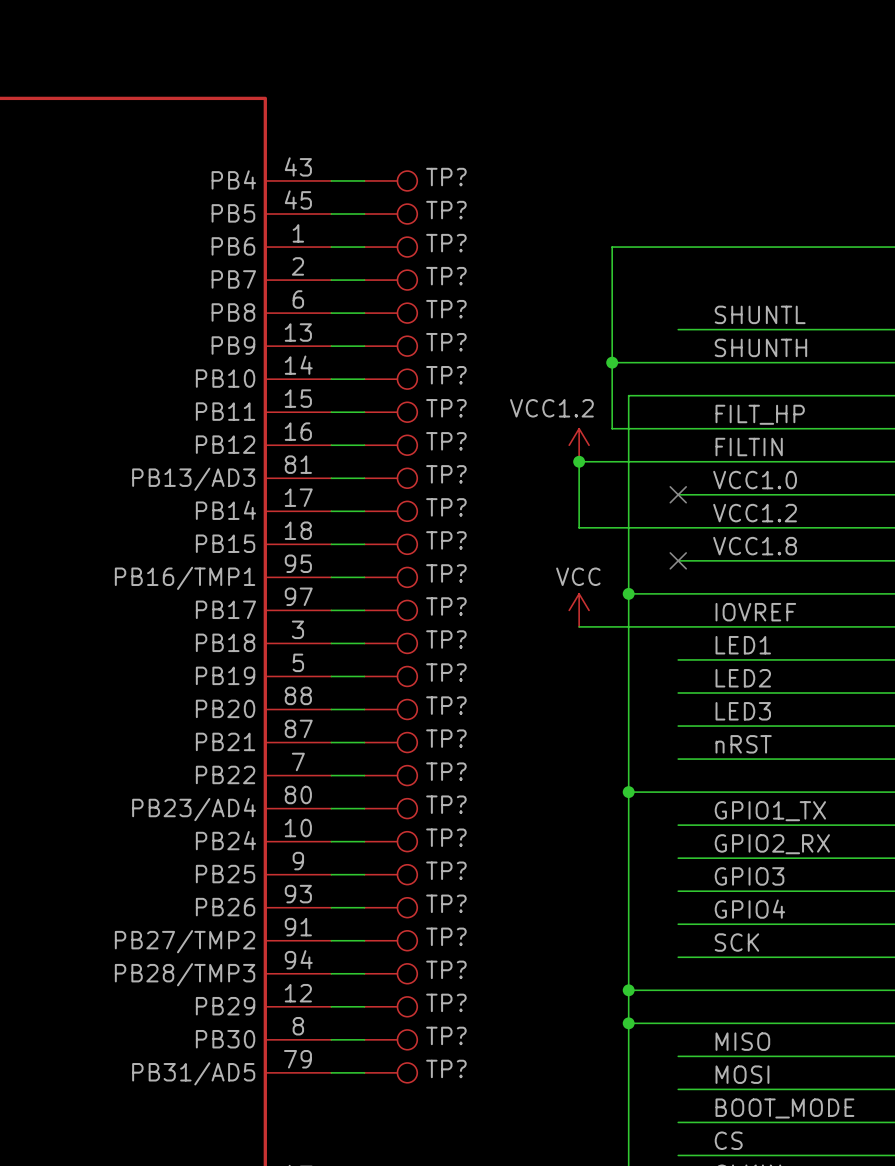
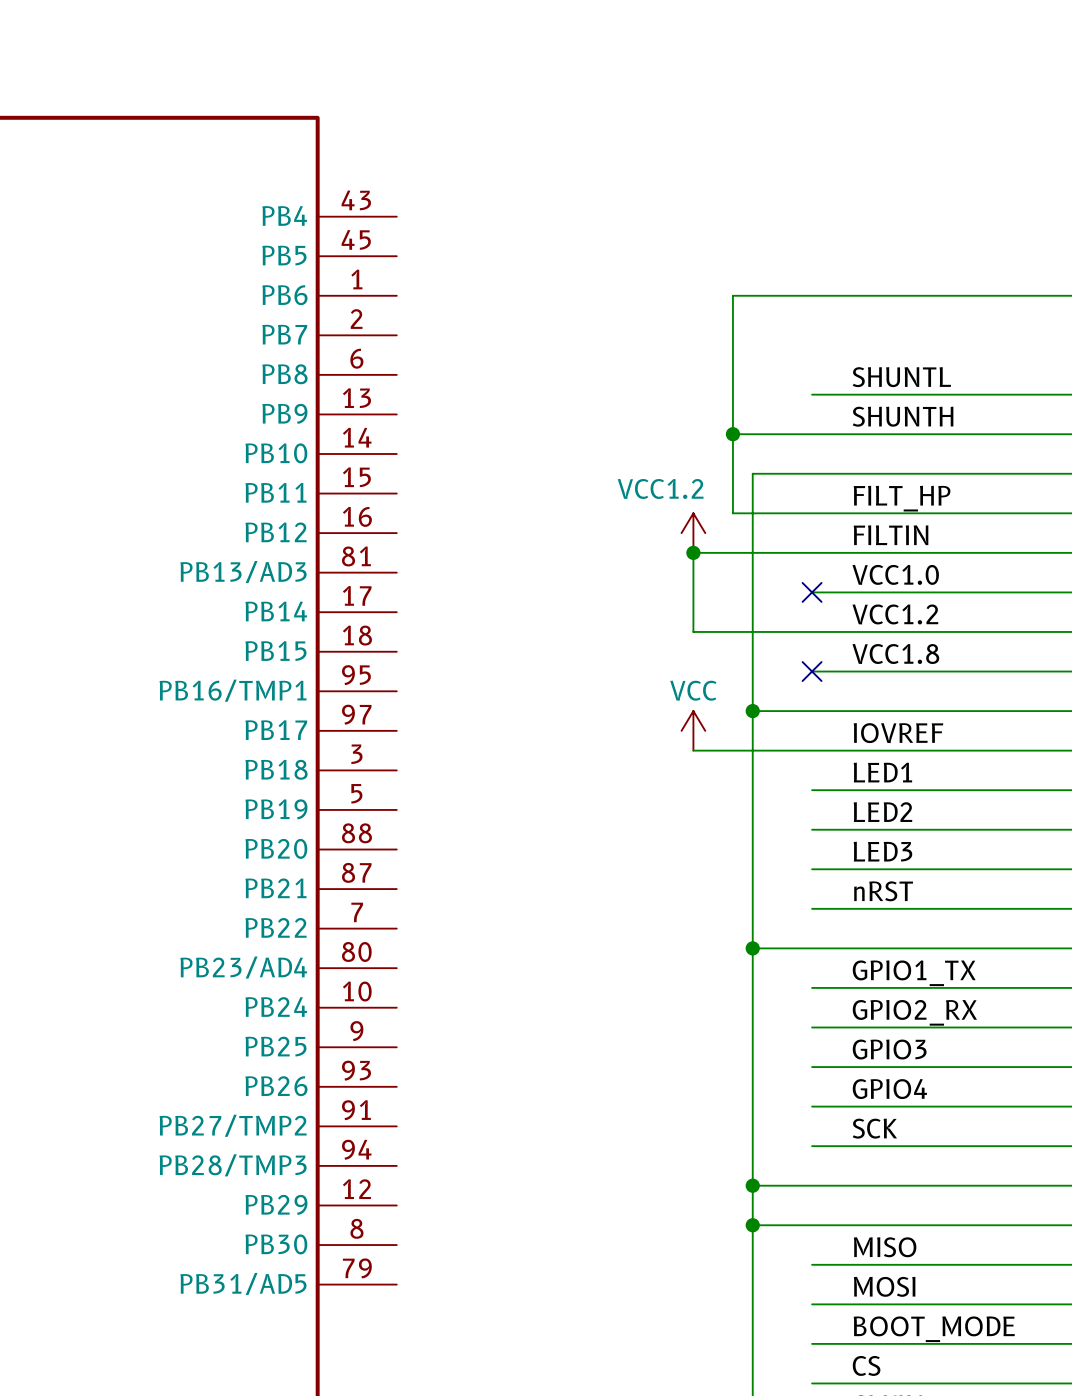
wire: (331, 180) (364, 180) -> none
TP?: (390, 180) -> none
wire: (331, 214) (364, 214) -> none
TP?: (390, 214) -> none
wire: (331, 247) (364, 247) -> none
TP?: (390, 247) -> none
wire: (331, 280) (364, 280) -> none
TP?: (390, 280) -> none
wire: (331, 313) (364, 313) -> none
TP?: (390, 313) -> none
wire: (331, 346) (364, 346) -> none
TP?: (390, 346) -> none
wire: (331, 379) (364, 379) -> none
TP?: (390, 379) -> none
wire: (331, 412) (364, 412) -> none
TP?: (390, 412) -> none
wire: (331, 445) (364, 445) -> none
TP?: (390, 445) -> none
wire: (331, 478) (364, 478) -> none
TP?: (390, 478) -> none
wire: (331, 511) (364, 511) -> none
TP?: (390, 511) -> none
wire: (331, 544) (364, 544) -> none
TP?: (390, 544) -> none
wire: (331, 577) (364, 577) -> none
TP?: (390, 577) -> none
wire: (331, 610) (364, 610) -> none
TP?: (390, 610) -> none
wire: (331, 643) (364, 643) -> none
TP?: (390, 643) -> none
wire: (331, 676) (364, 676) -> none
TP?: (390, 676) -> none
wire: (331, 709) (364, 709) -> none
TP?: (390, 709) -> none
wire: (331, 742) (364, 742) -> none
TP?: (390, 742) -> none
wire: (331, 775) (364, 775) -> none
TP?: (390, 775) -> none
wire: (331, 808) (364, 808) -> none
TP?: (390, 808) -> none
wire: (331, 841) (364, 841) -> none
TP?: (390, 841) -> none
wire: (331, 874) (364, 874) -> none
TP?: (390, 874) -> none
wire: (331, 907) (364, 907) -> none
TP?: (390, 907) -> none
wire: (331, 940) (364, 940) -> none
TP?: (390, 940) -> none
wire: (331, 973) (364, 973) -> none
TP?: (390, 973) -> none
wire: (331, 1006) (364, 1006) -> none
TP?: (390, 1006) -> none
wire: (331, 1039) (364, 1039) -> none
TP?: (390, 1039) -> none
wire: (331, 1072) (364, 1072) -> none
TP?: (390, 1072) -> none

